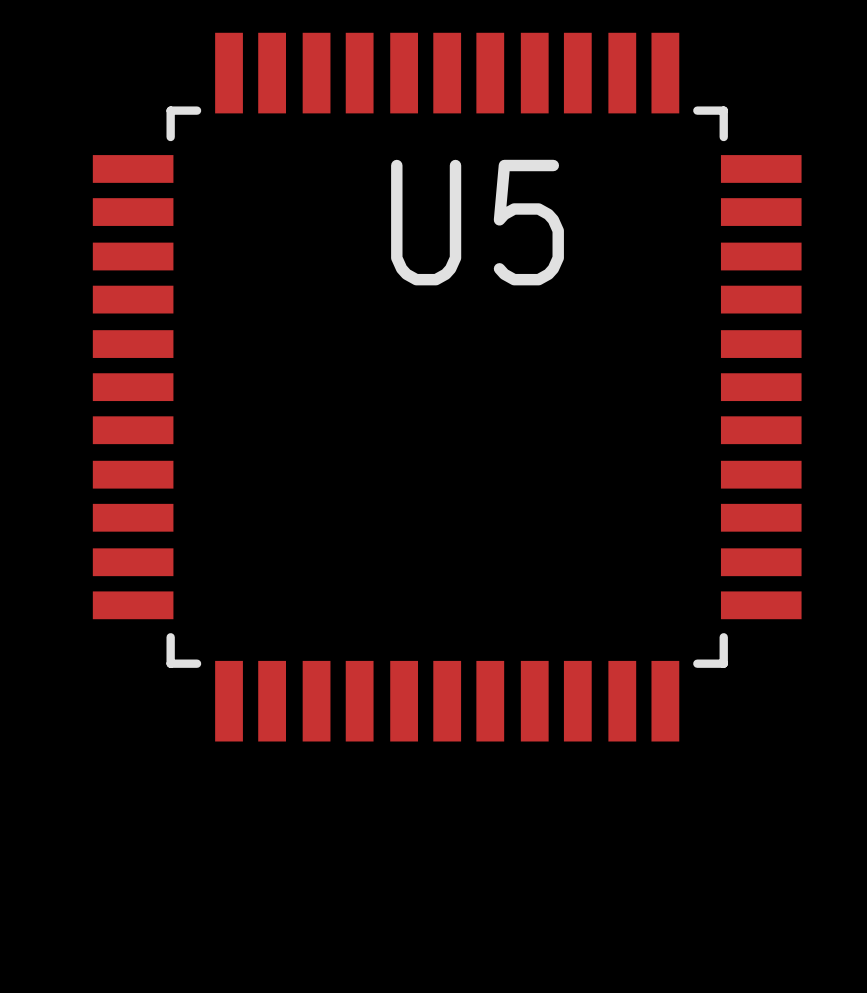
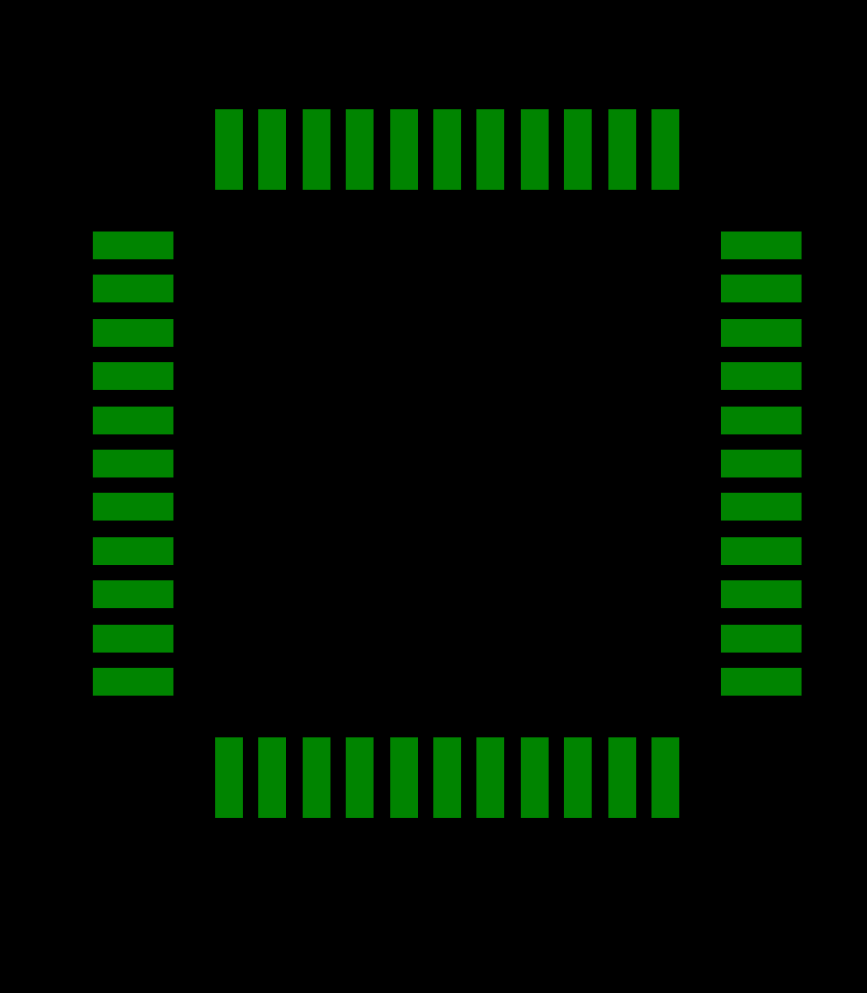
U5 side: top (447, 387) -> bottom (447, 463)

